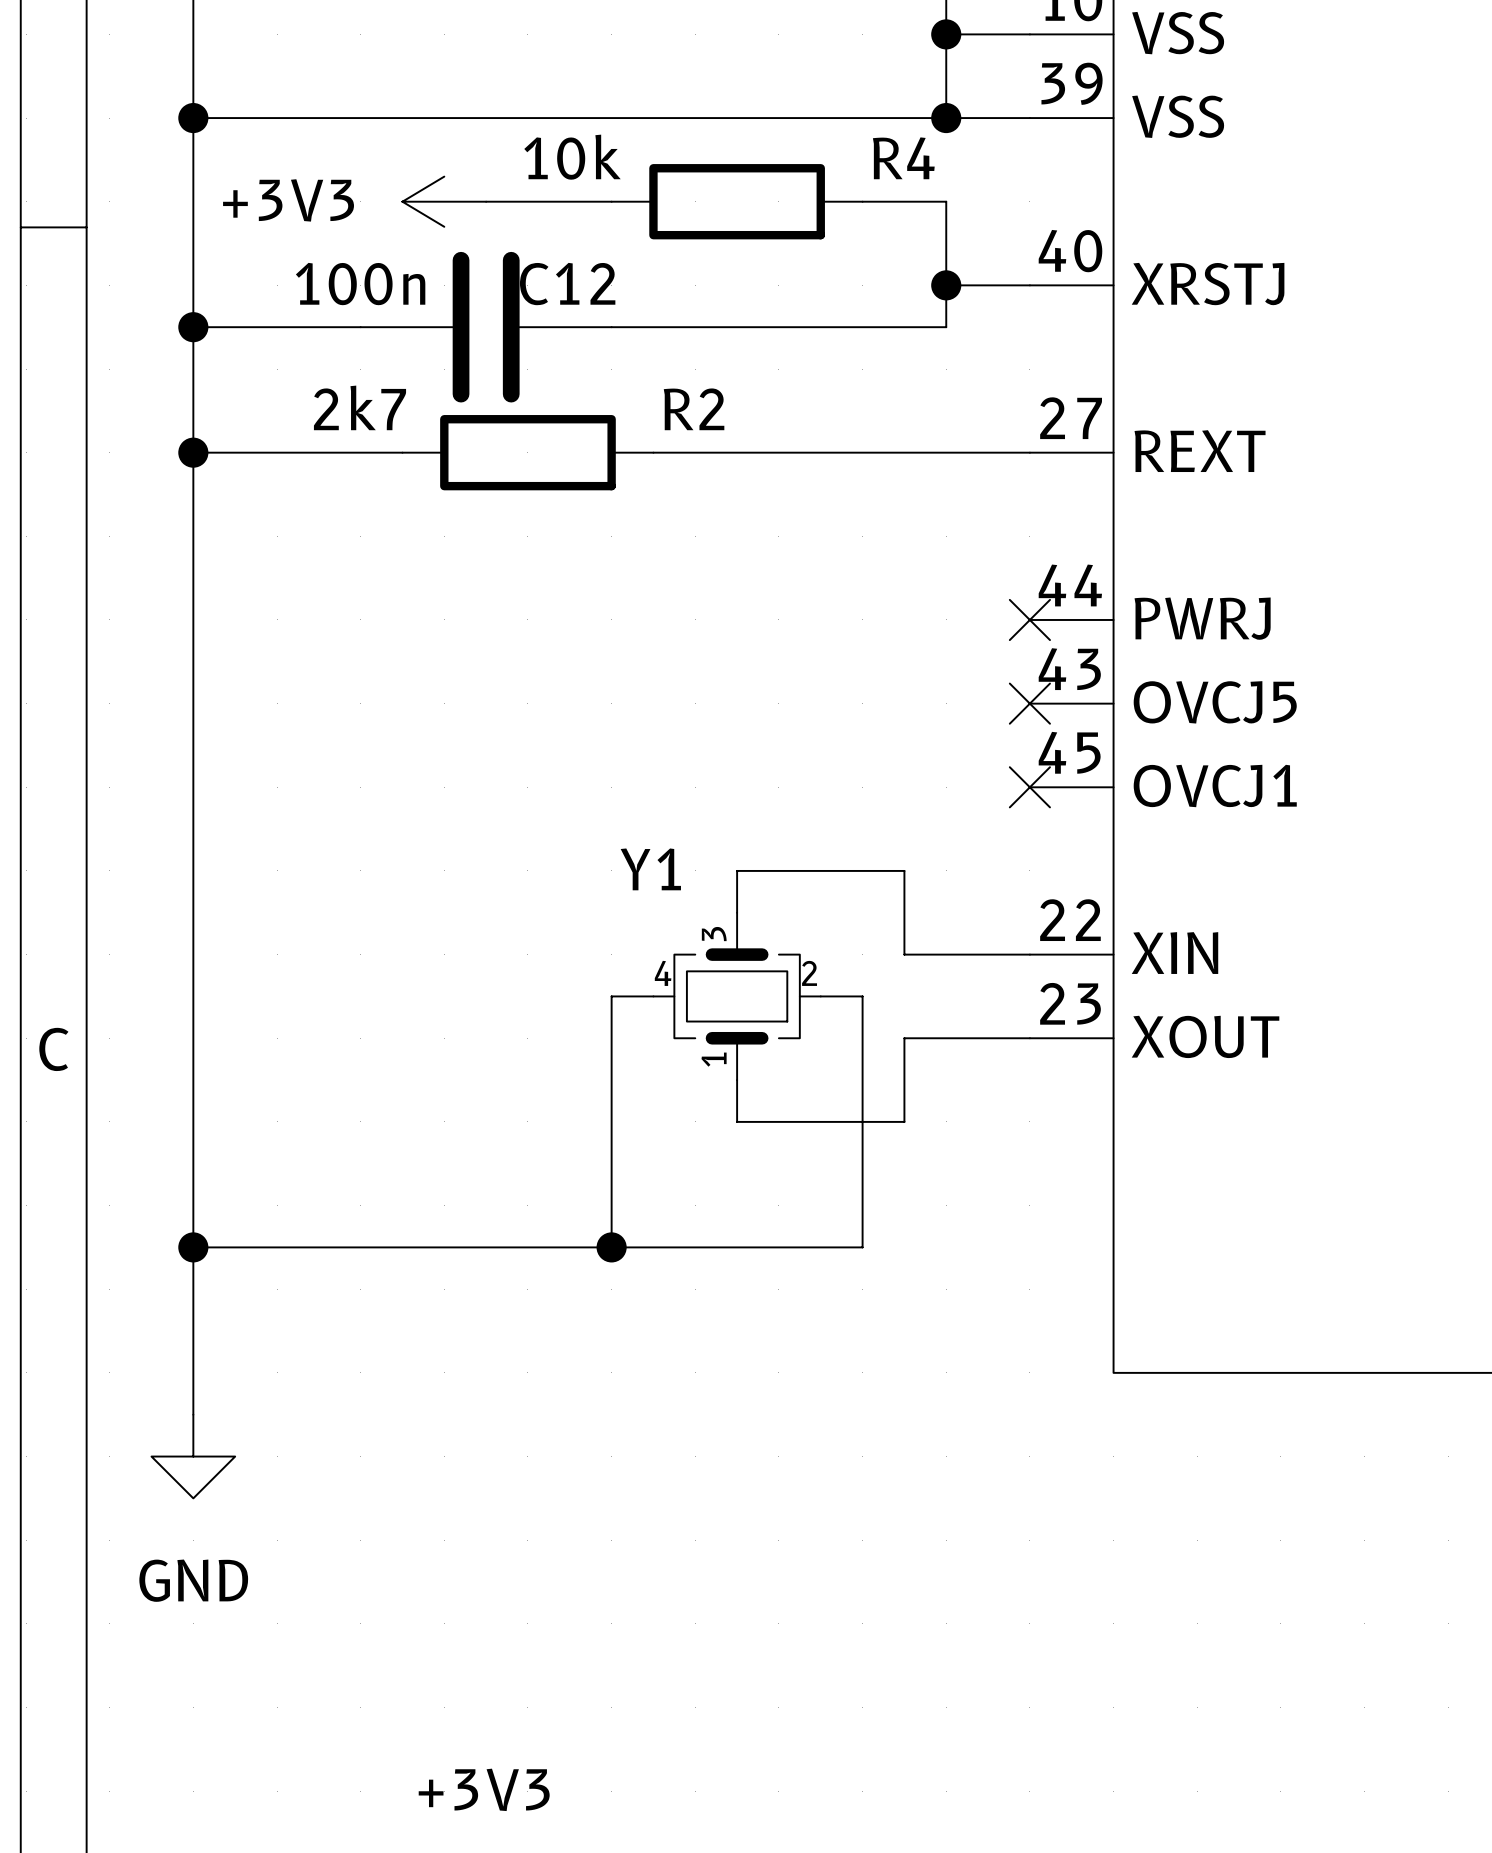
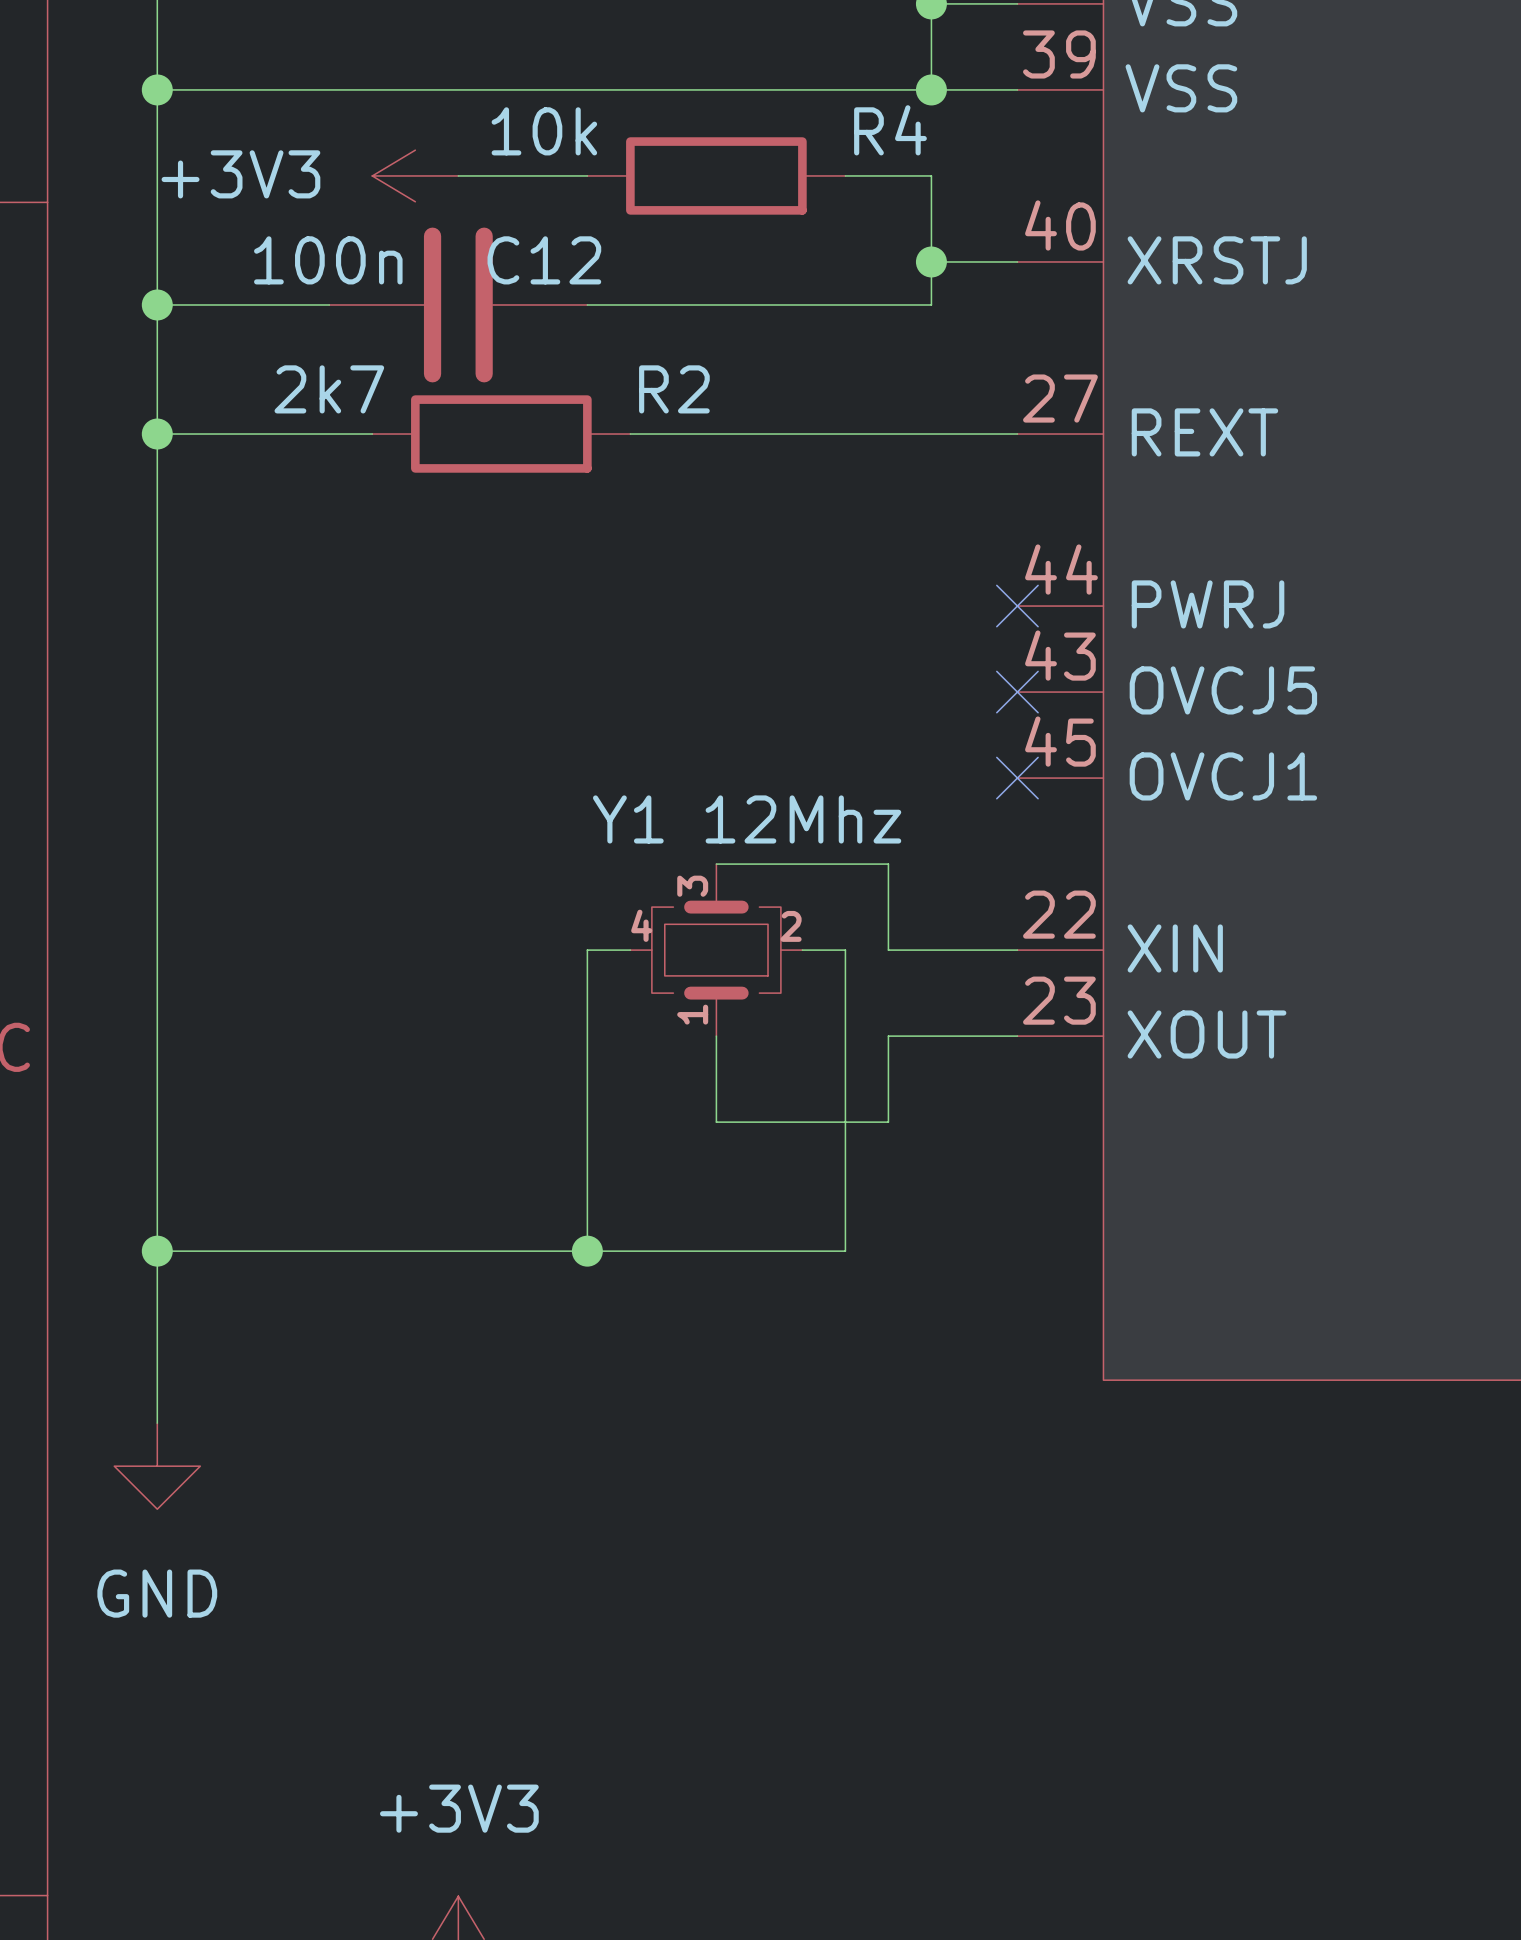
Y1 value: none -> 12Mhz (803, 819)
wire: (611, 996) (653, 996) -> (587, 993) (587, 950) (630, 950)
Y1 position: (737, 996) -> (716, 950)
wire: (820, 996) (862, 996) -> (802, 950) (845, 950) (845, 993)

